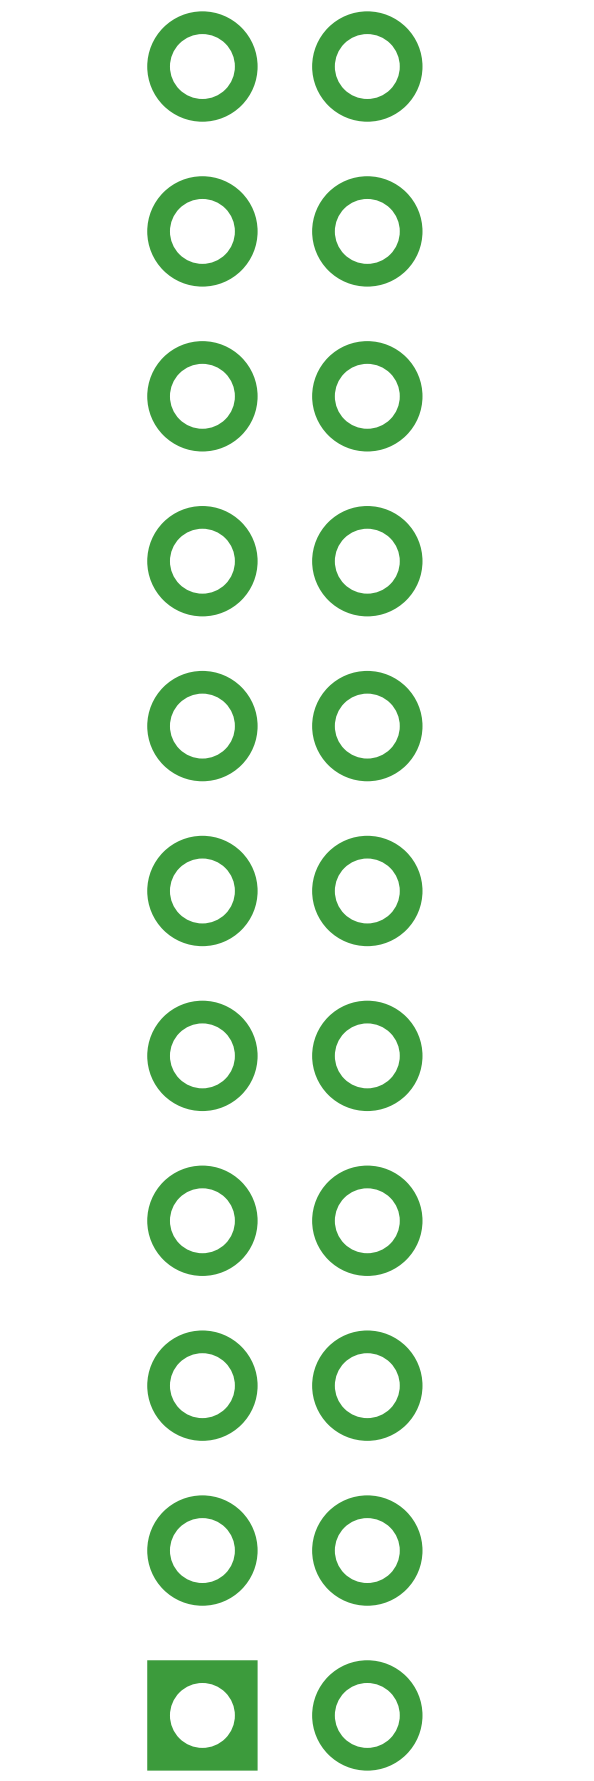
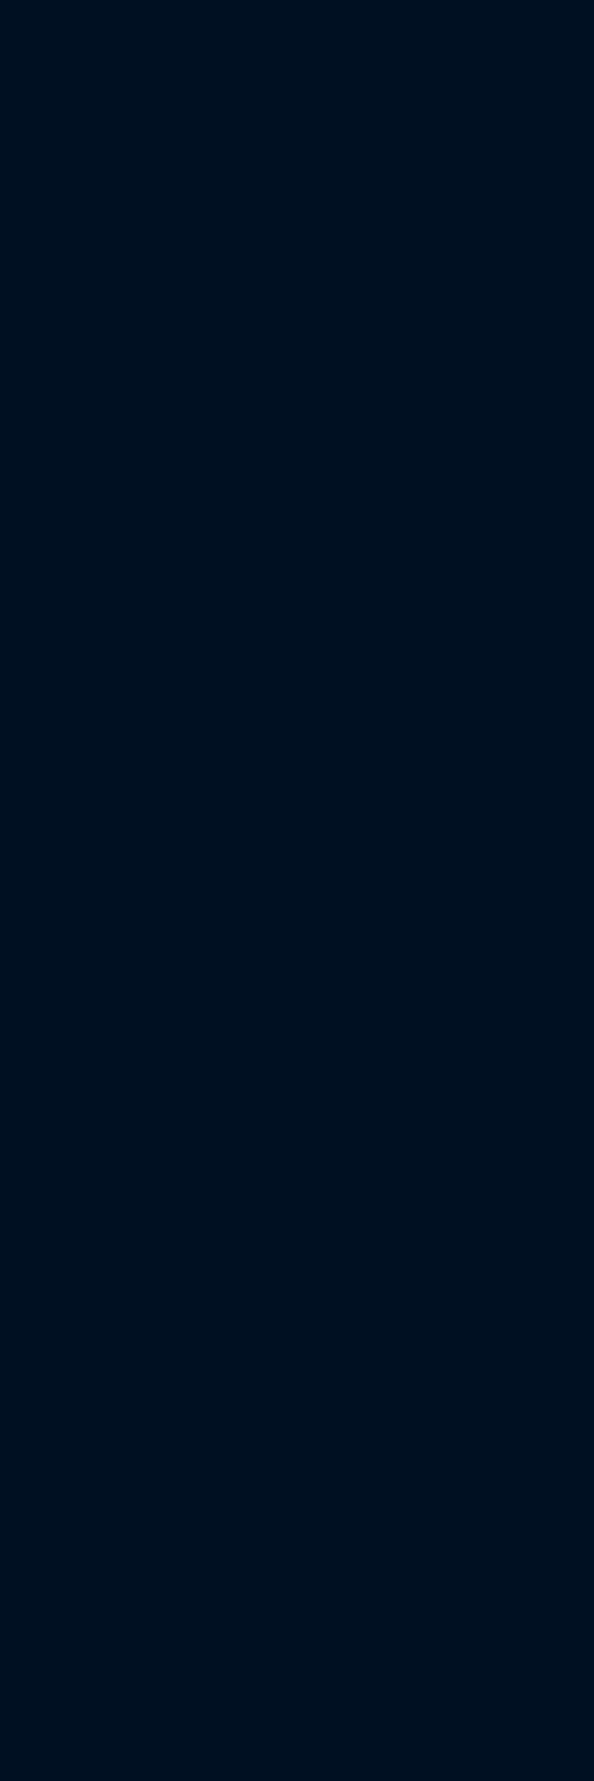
part: (284, 890) -> none

